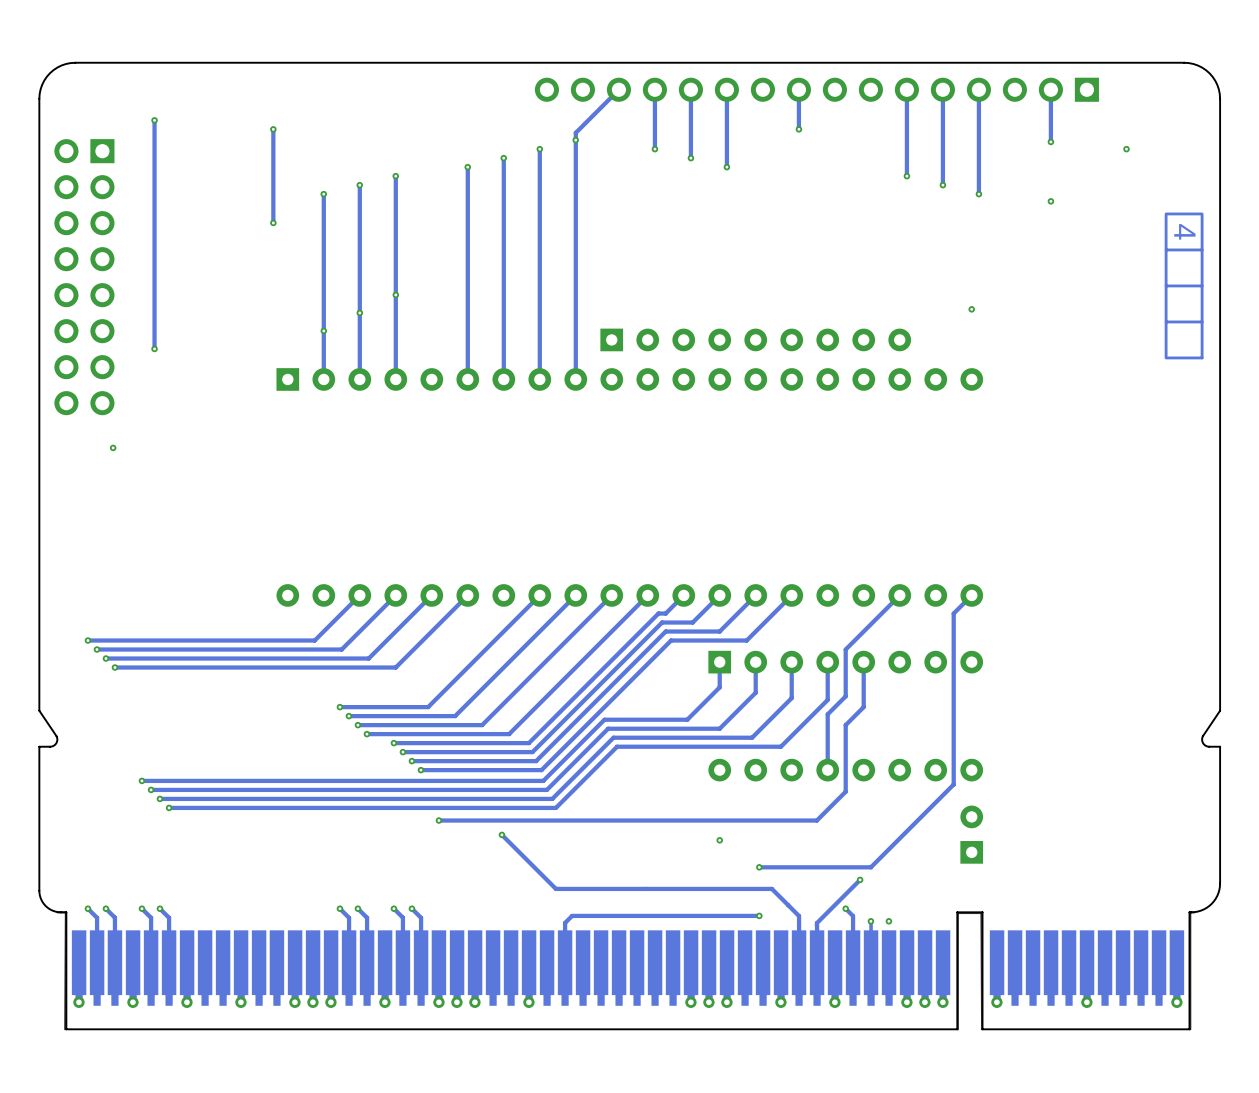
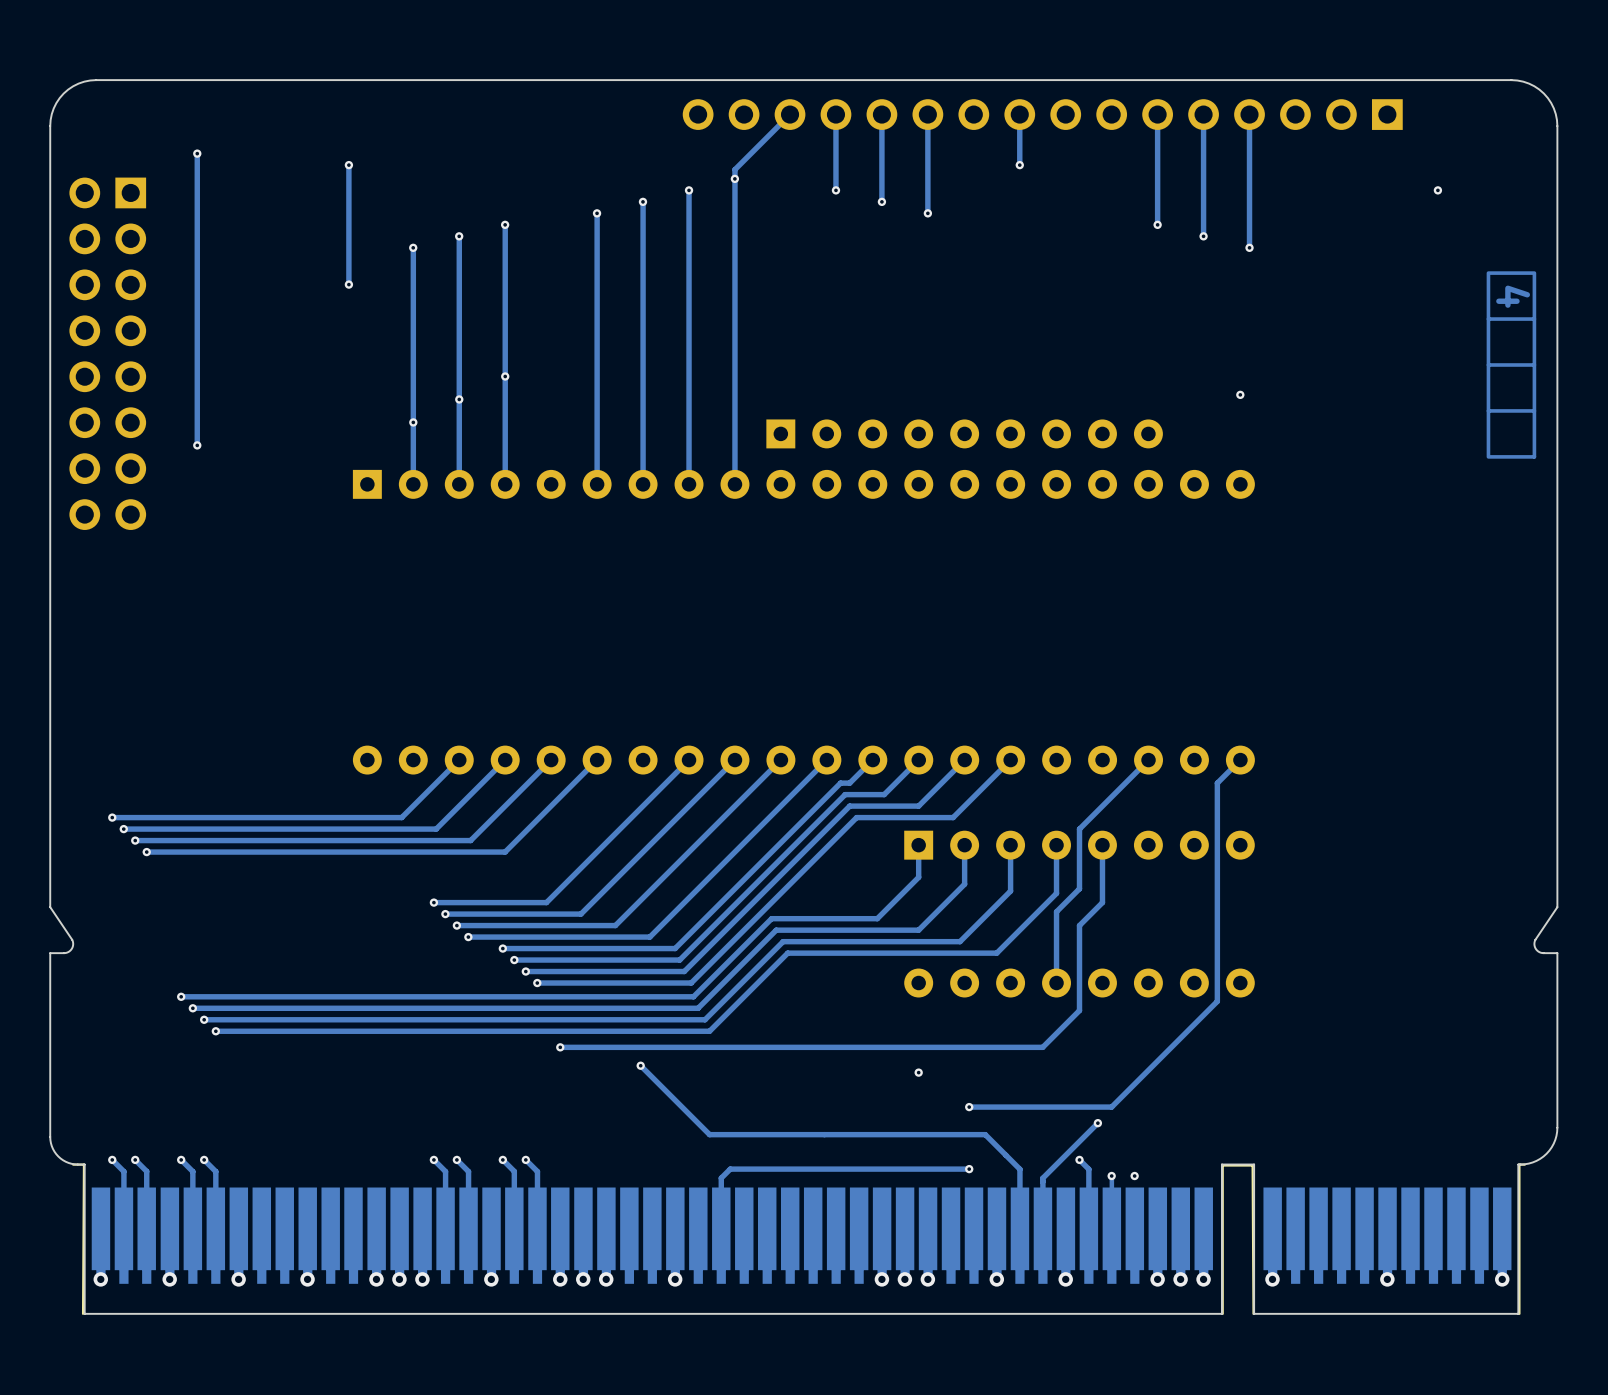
track: (1050, 89) (1050, 141) -> none
via: (1050, 141) -> none
via: (1050, 201) -> none
via: (113, 447) -> none
part: (971, 834) -> none

